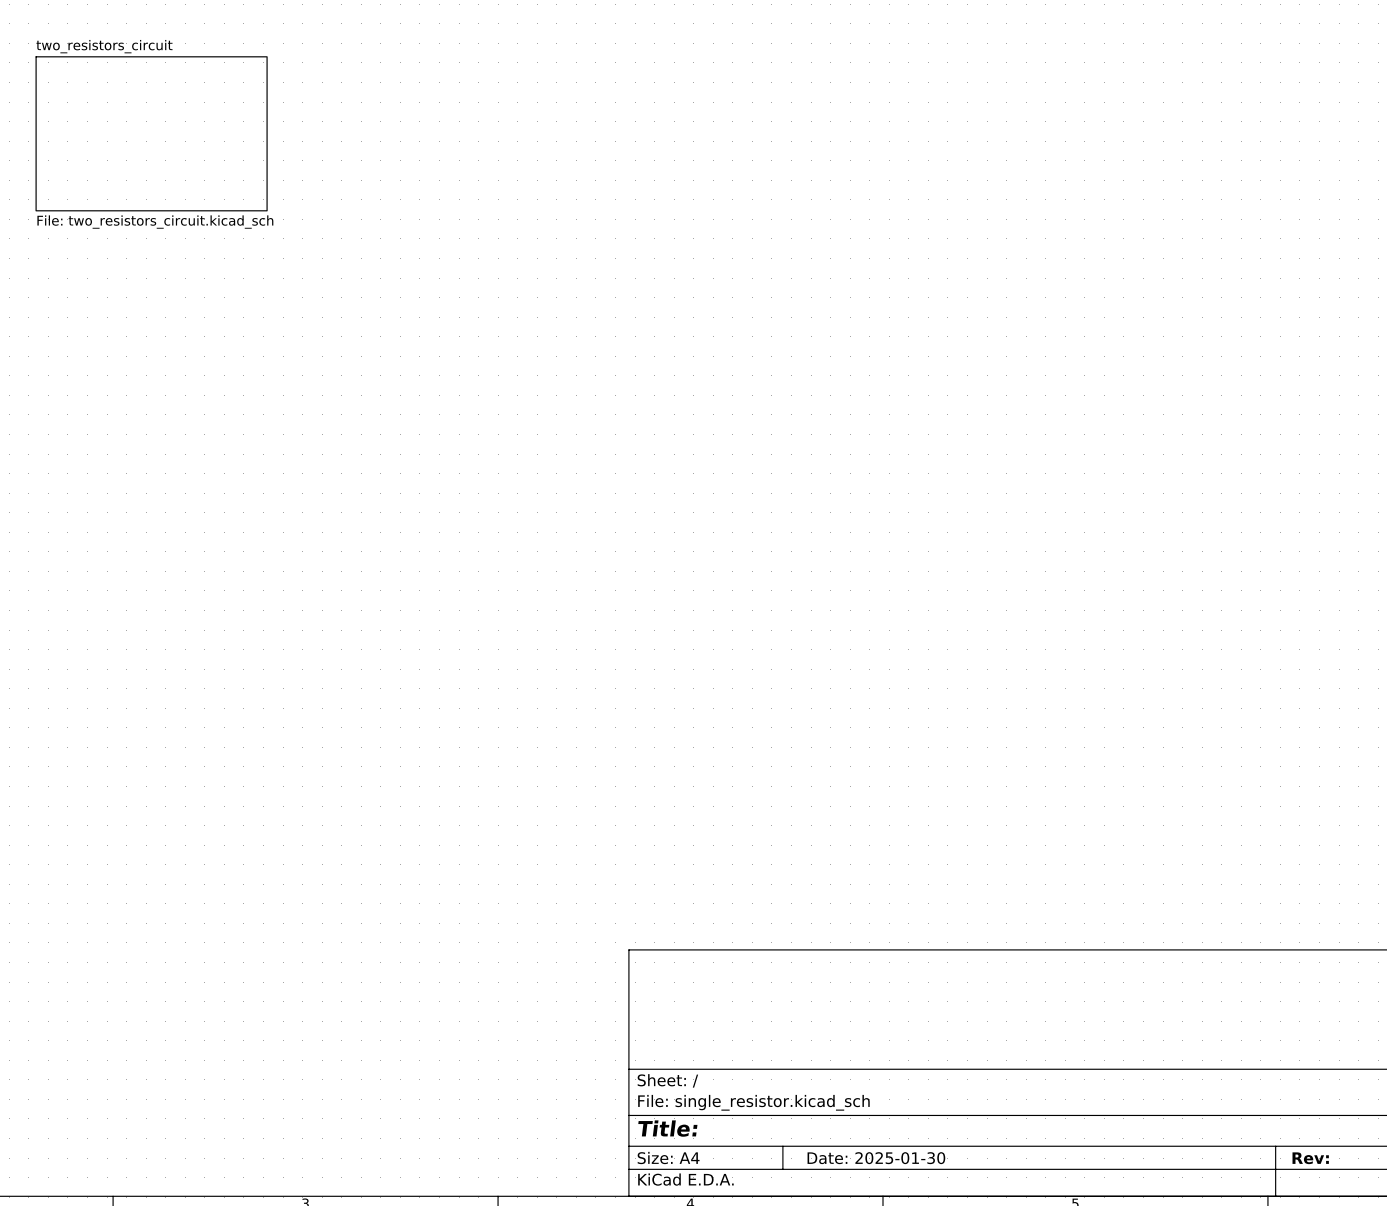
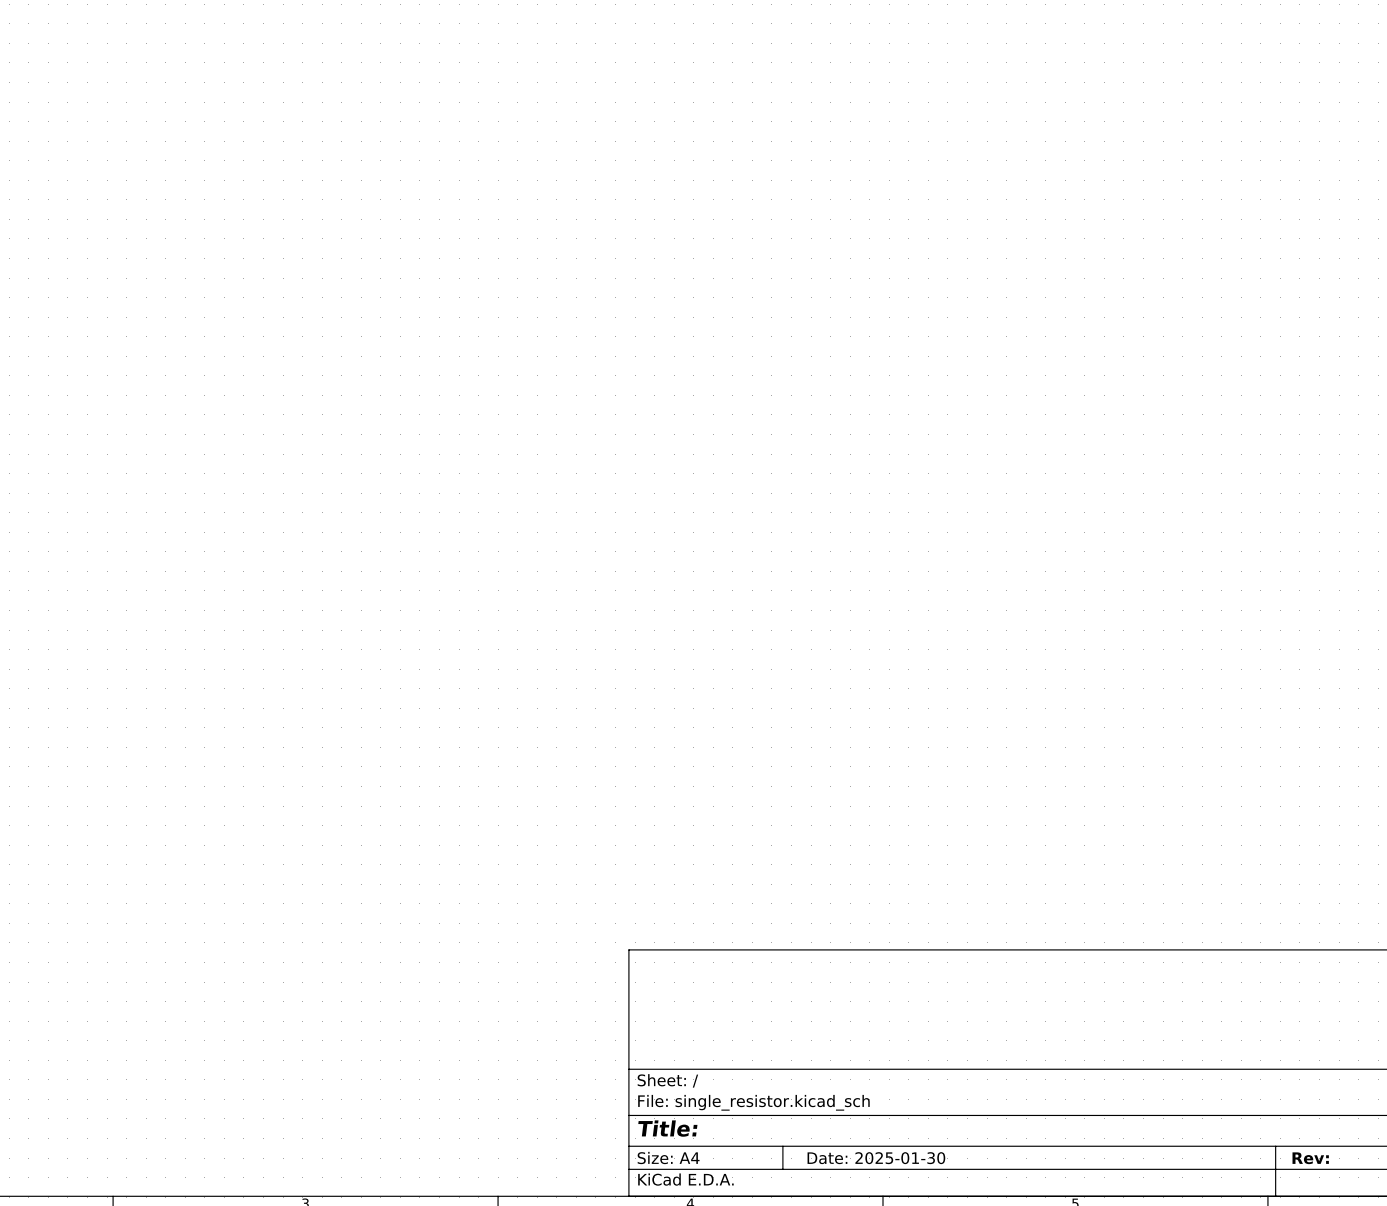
sheet two_resistors_circuit: File: two_resistors_circuit.kicad_sch (151, 133) -> none

